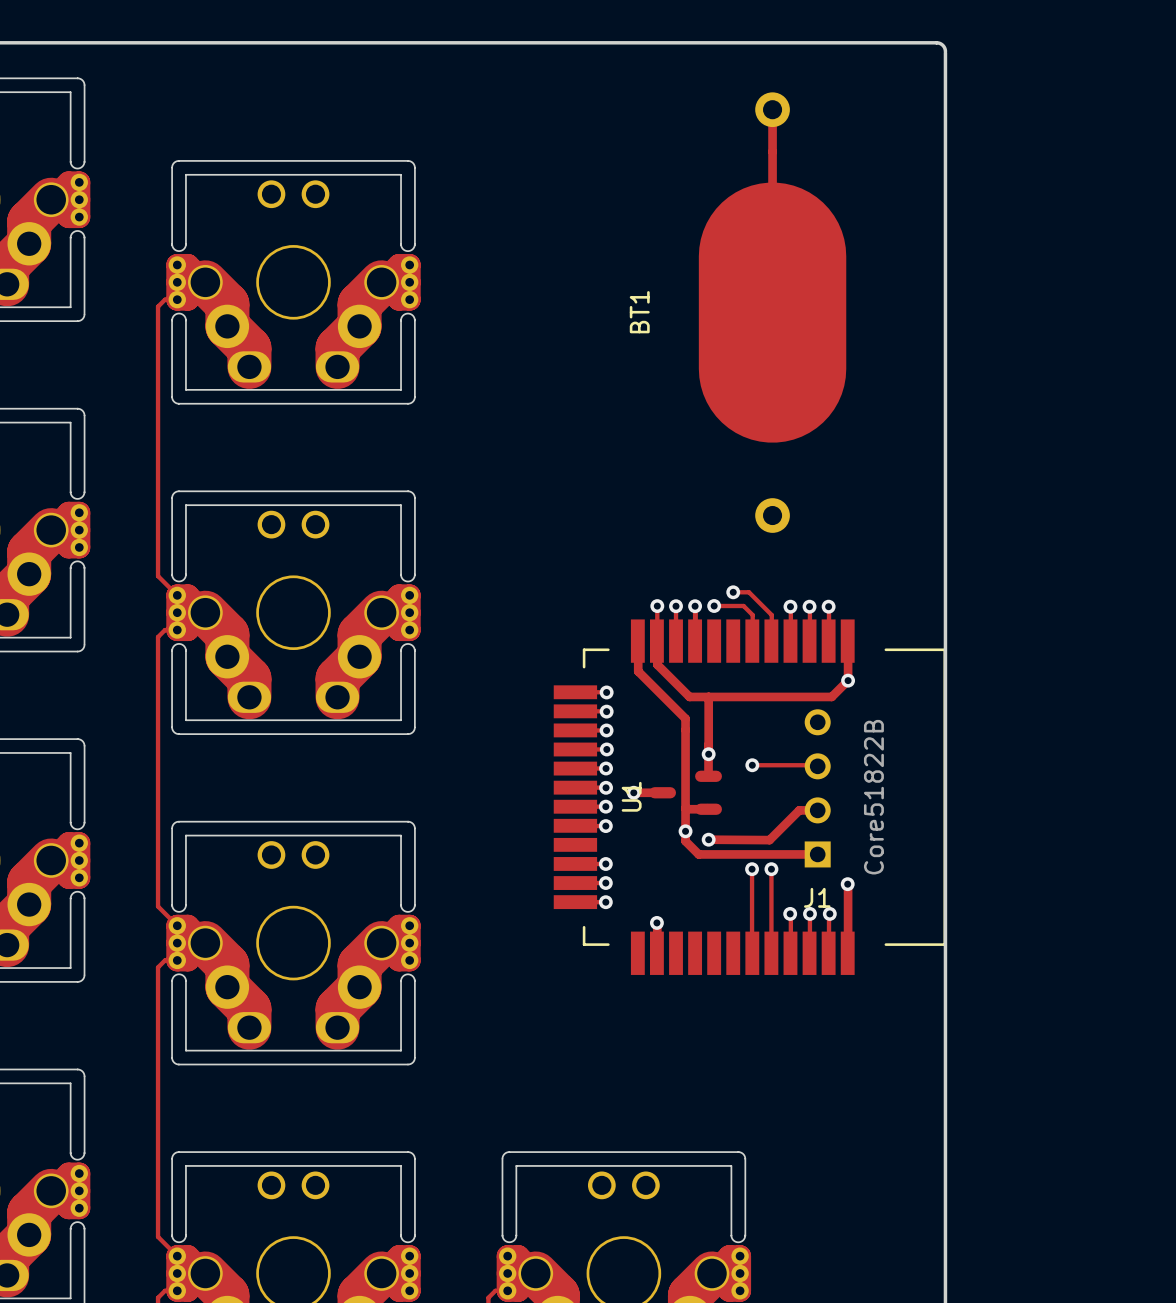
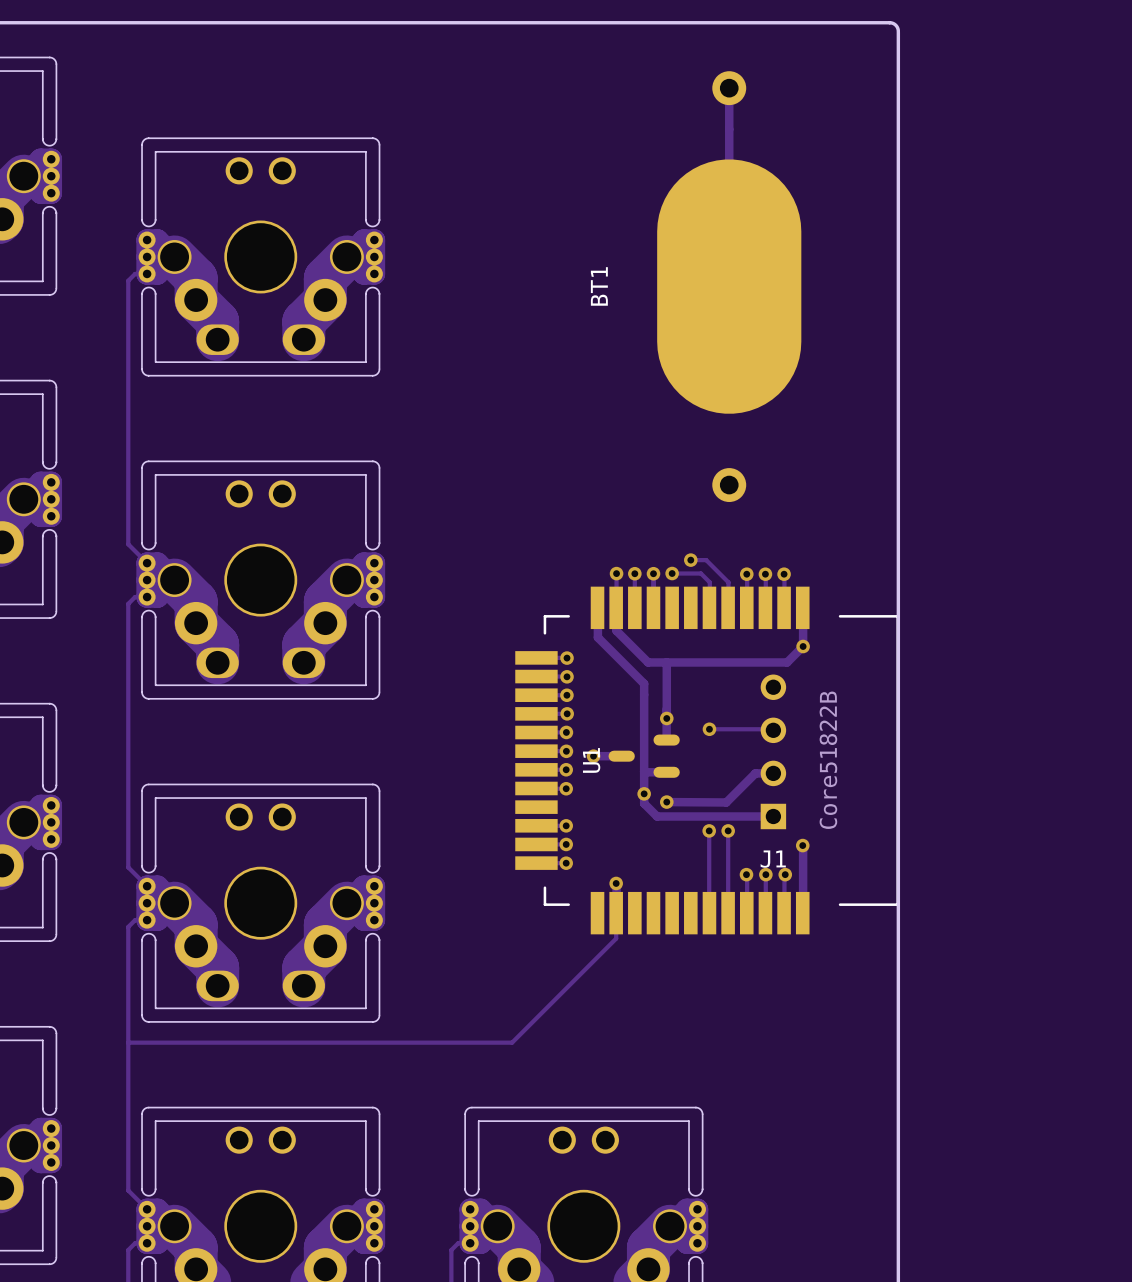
track: none -> (616, 913) (616, 938) (512, 1042) (128, 1042)

